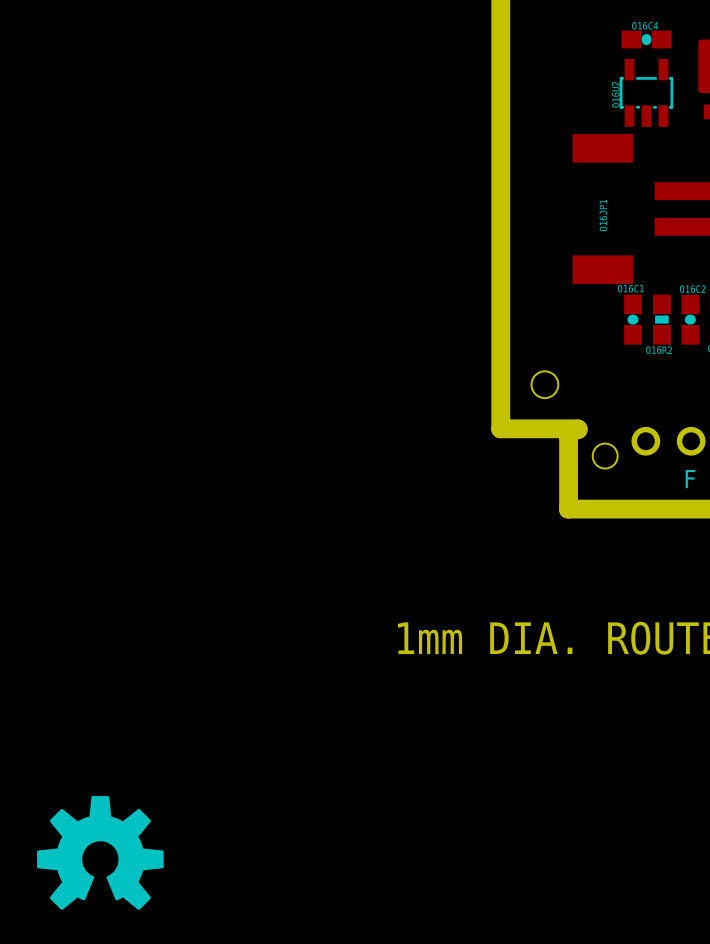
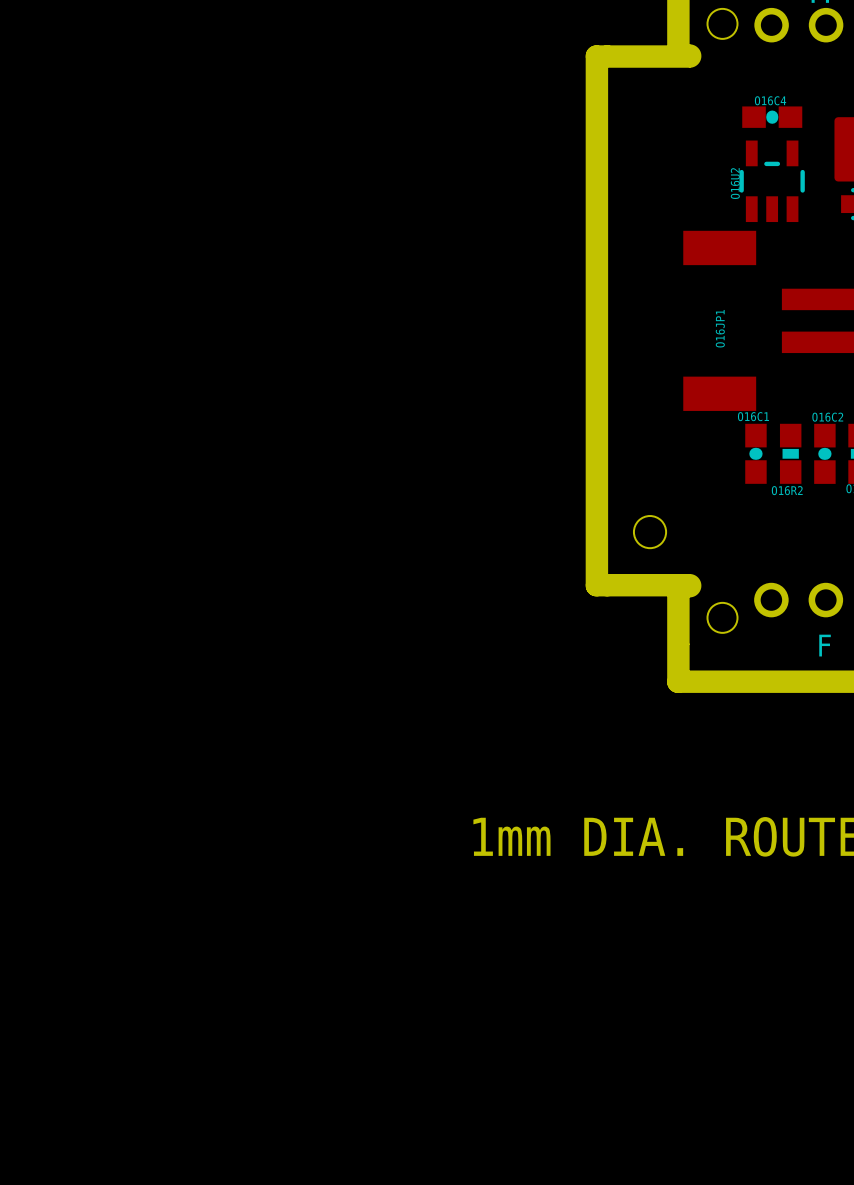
O16U2 footprint: [619, 58, 674, 127] -> [739, 140, 805, 223]
drawing: [37, 796, 164, 910] -> none

